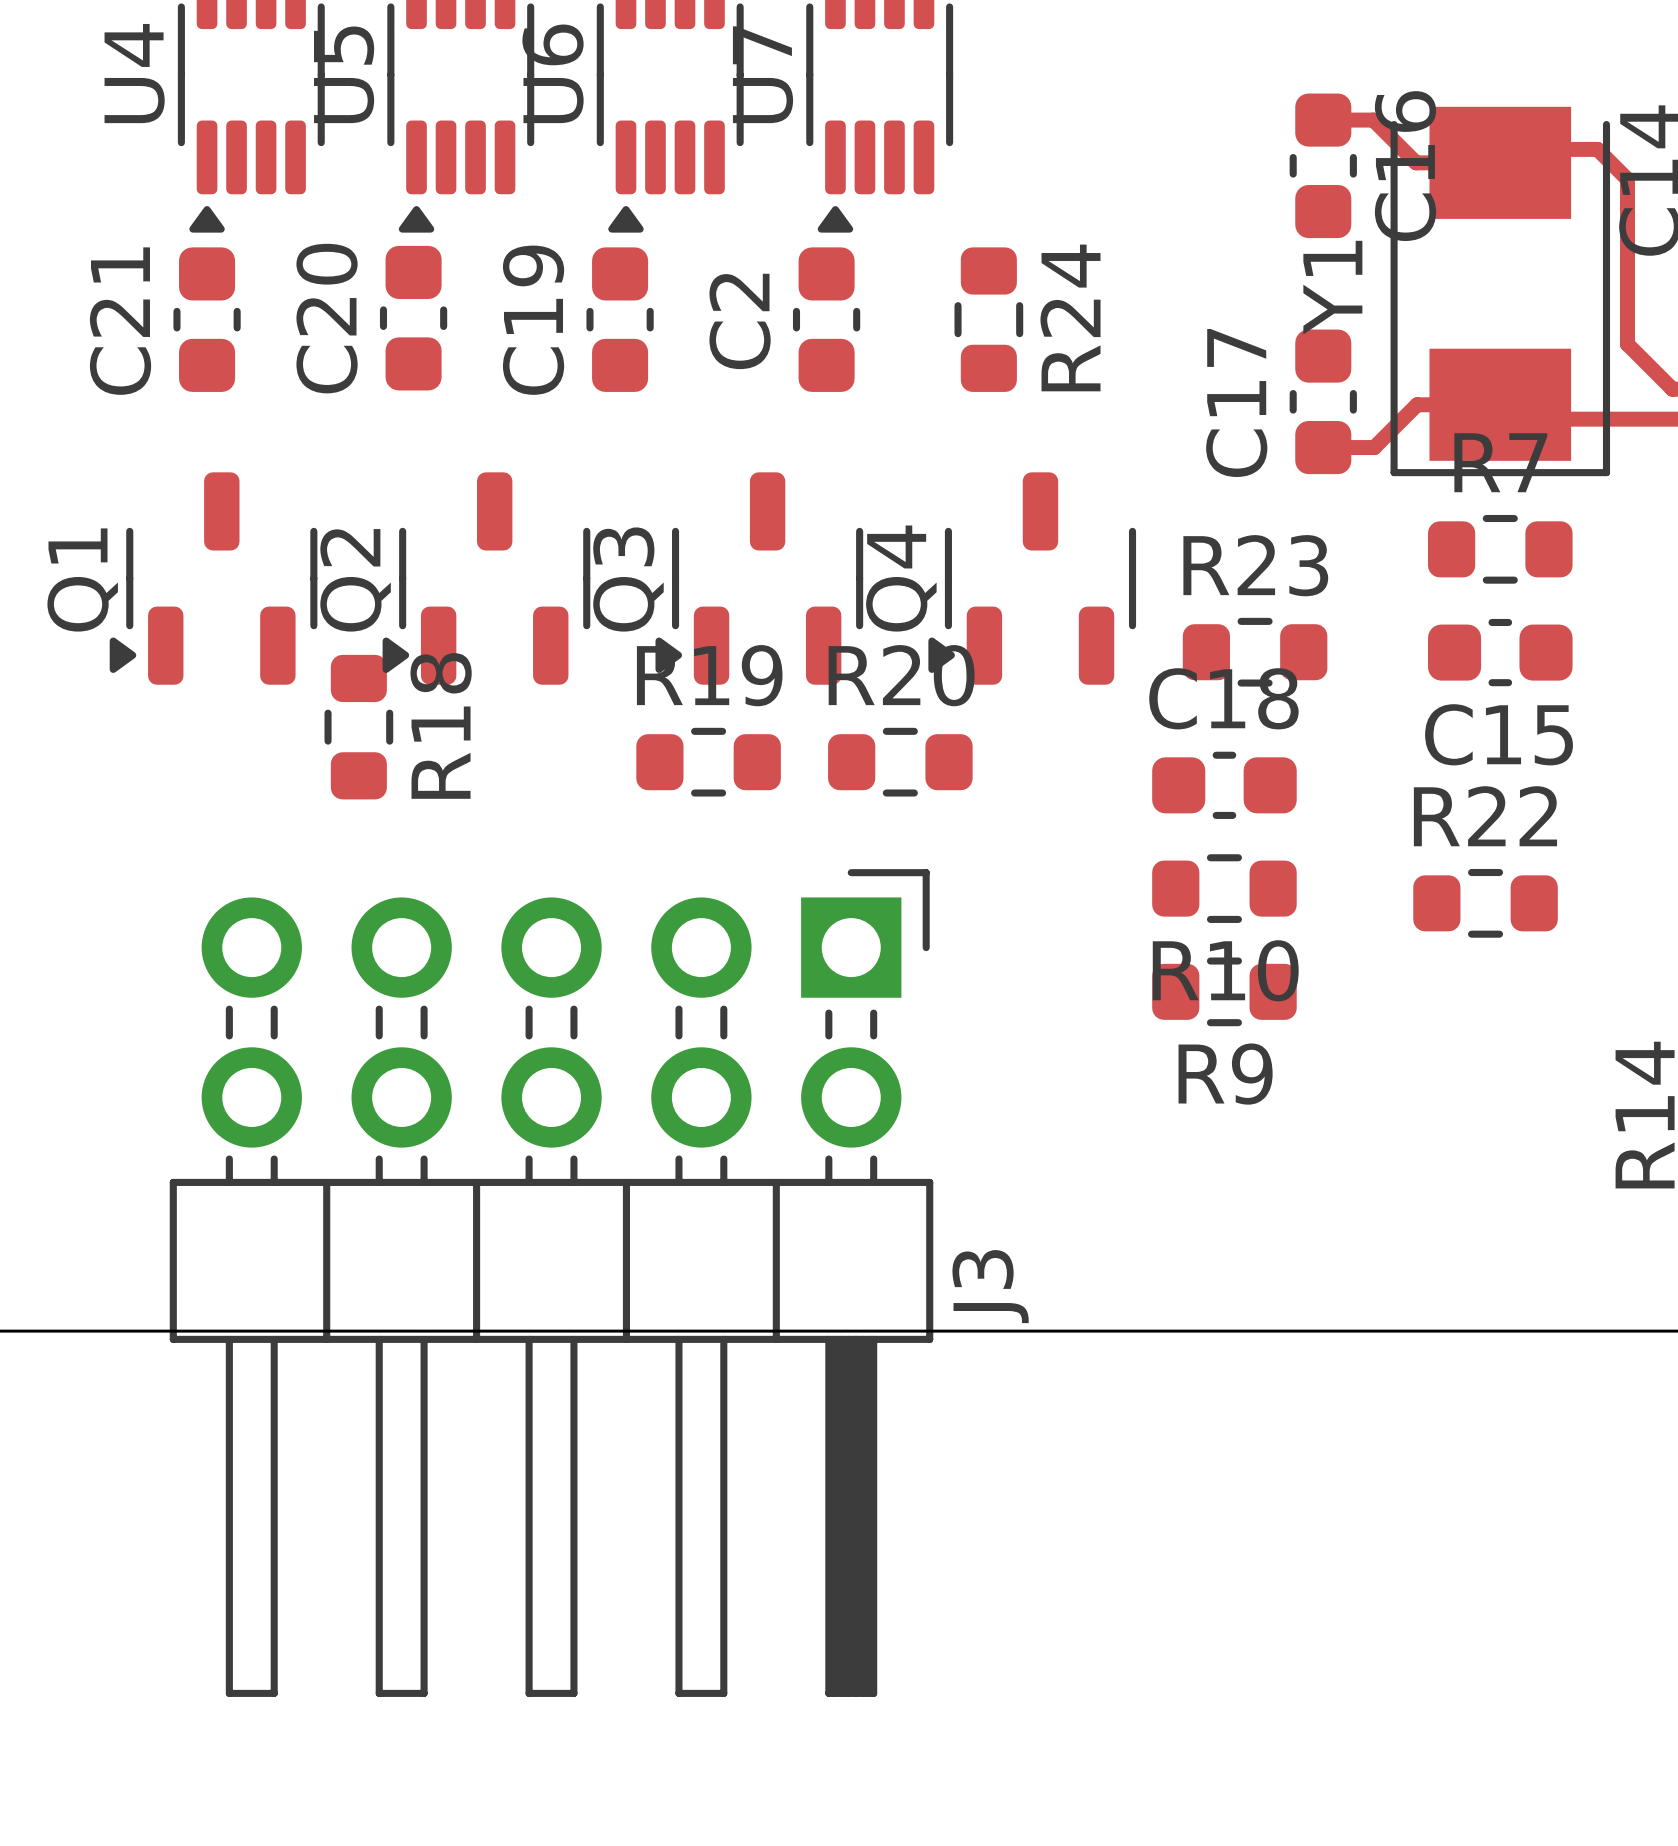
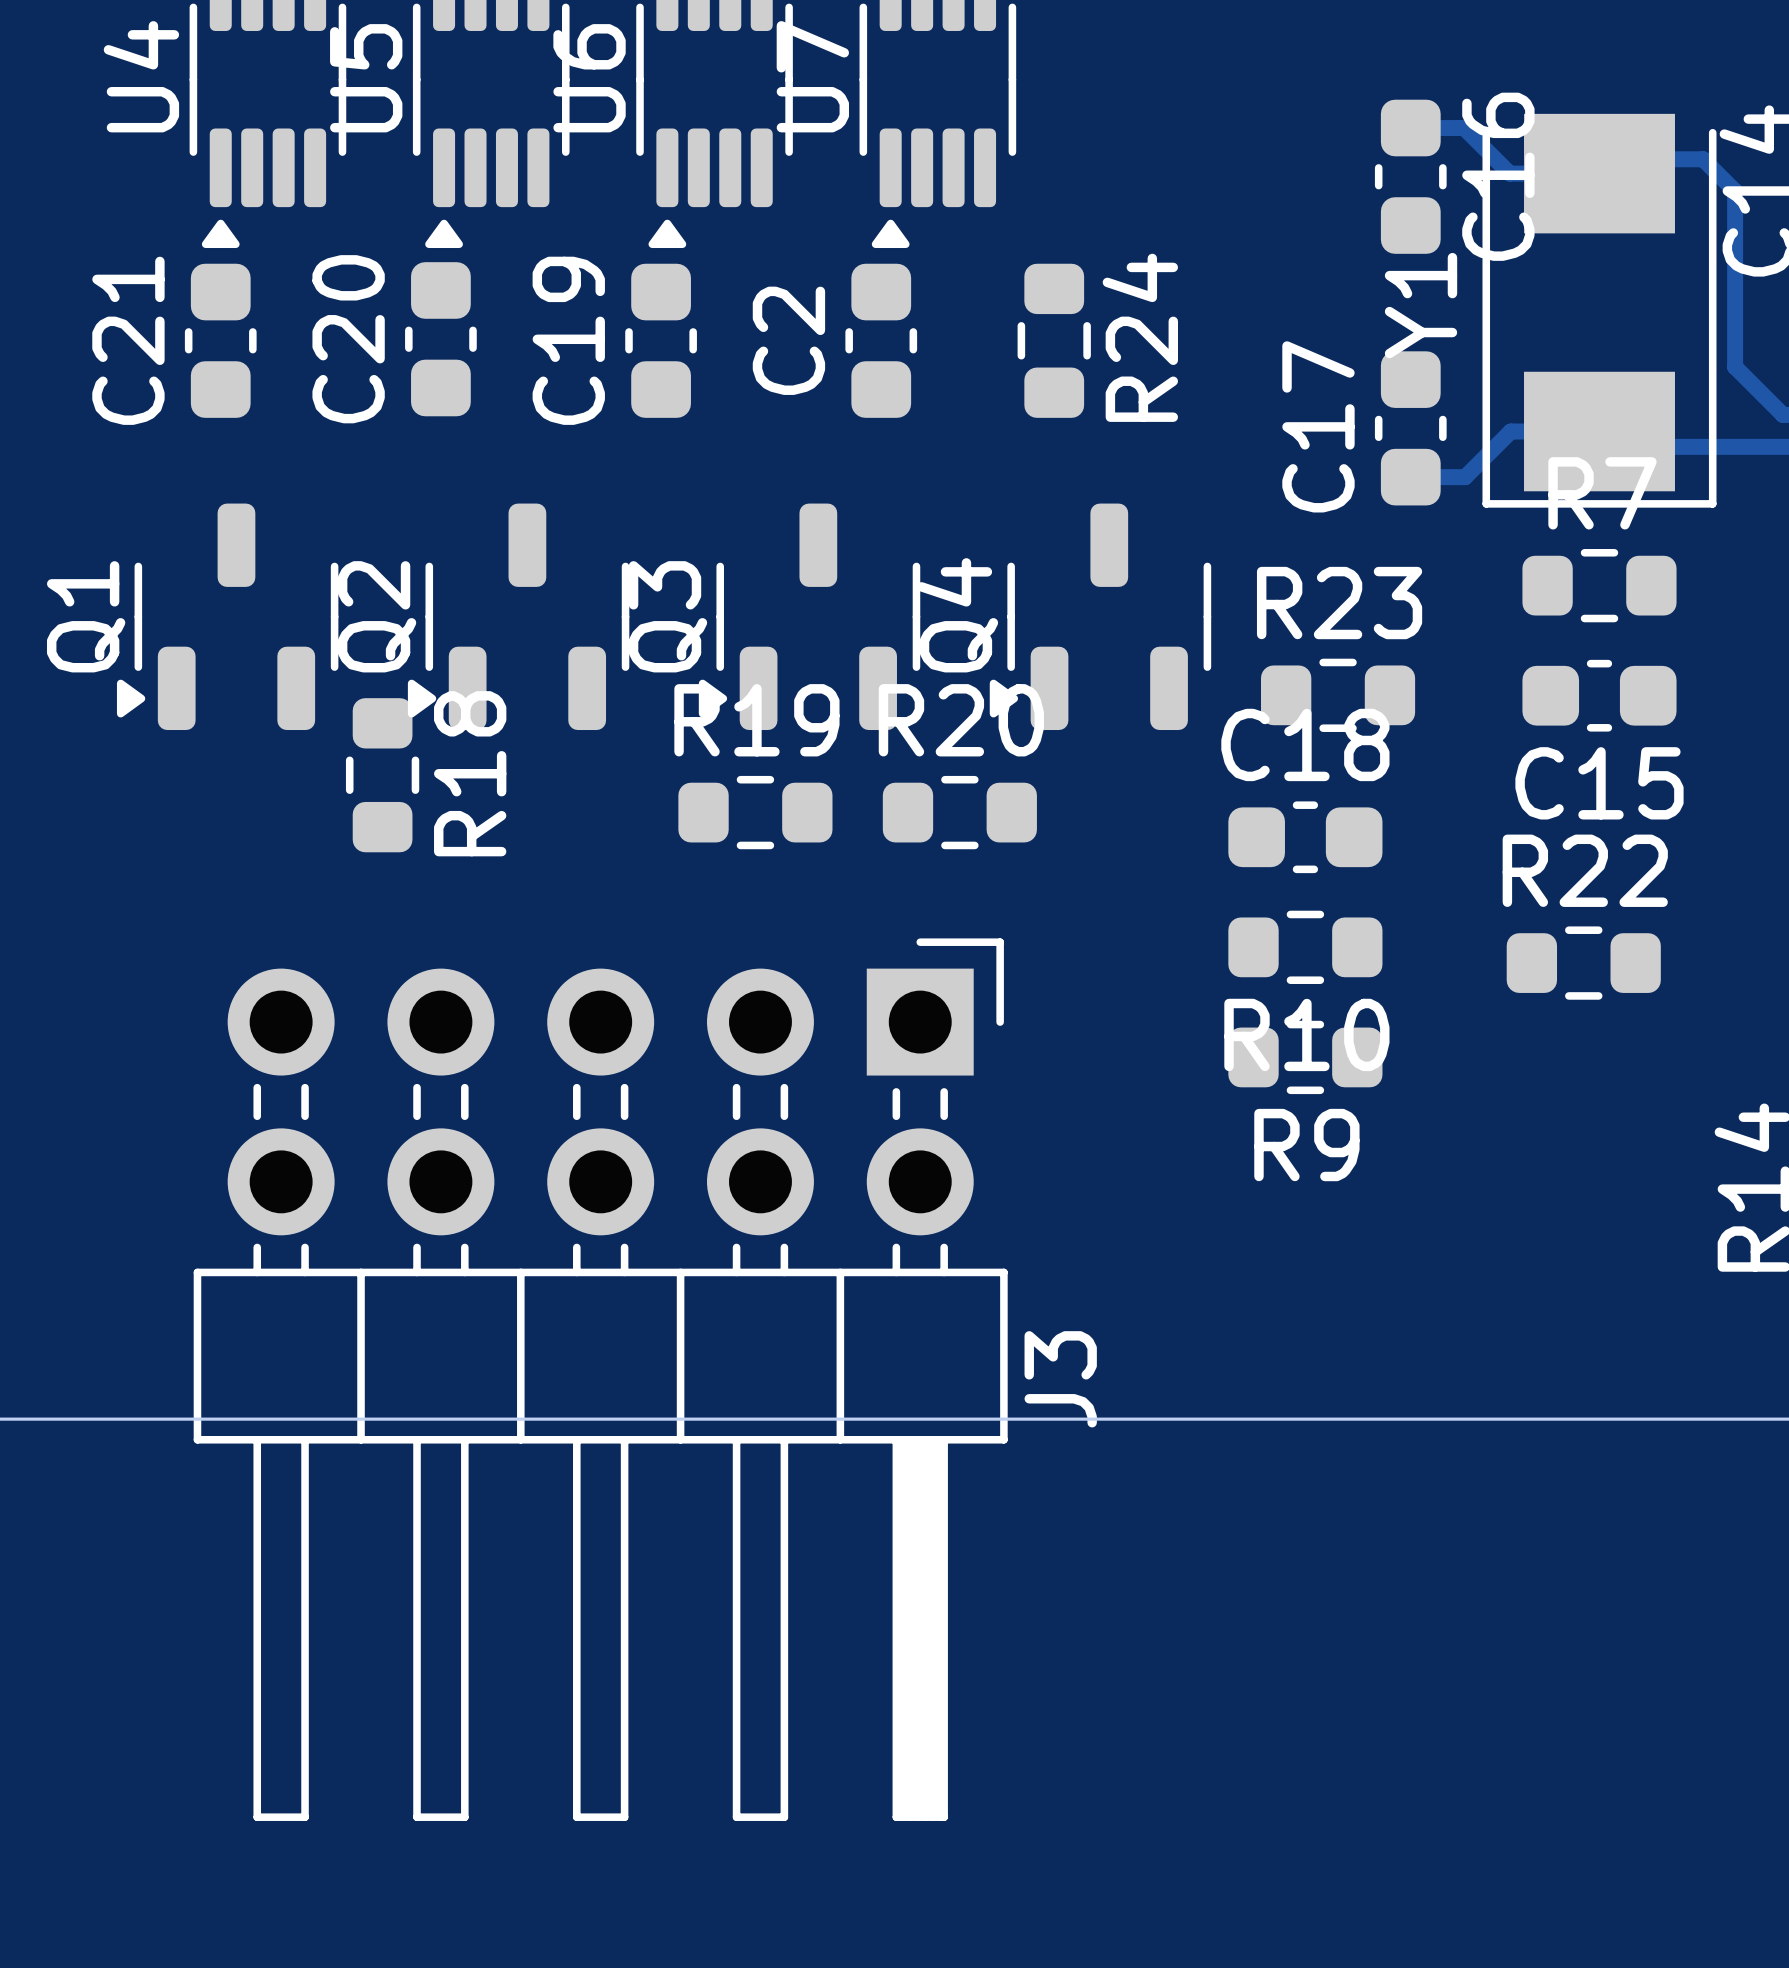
J3 position: (551, 1283) -> (600, 1379)

